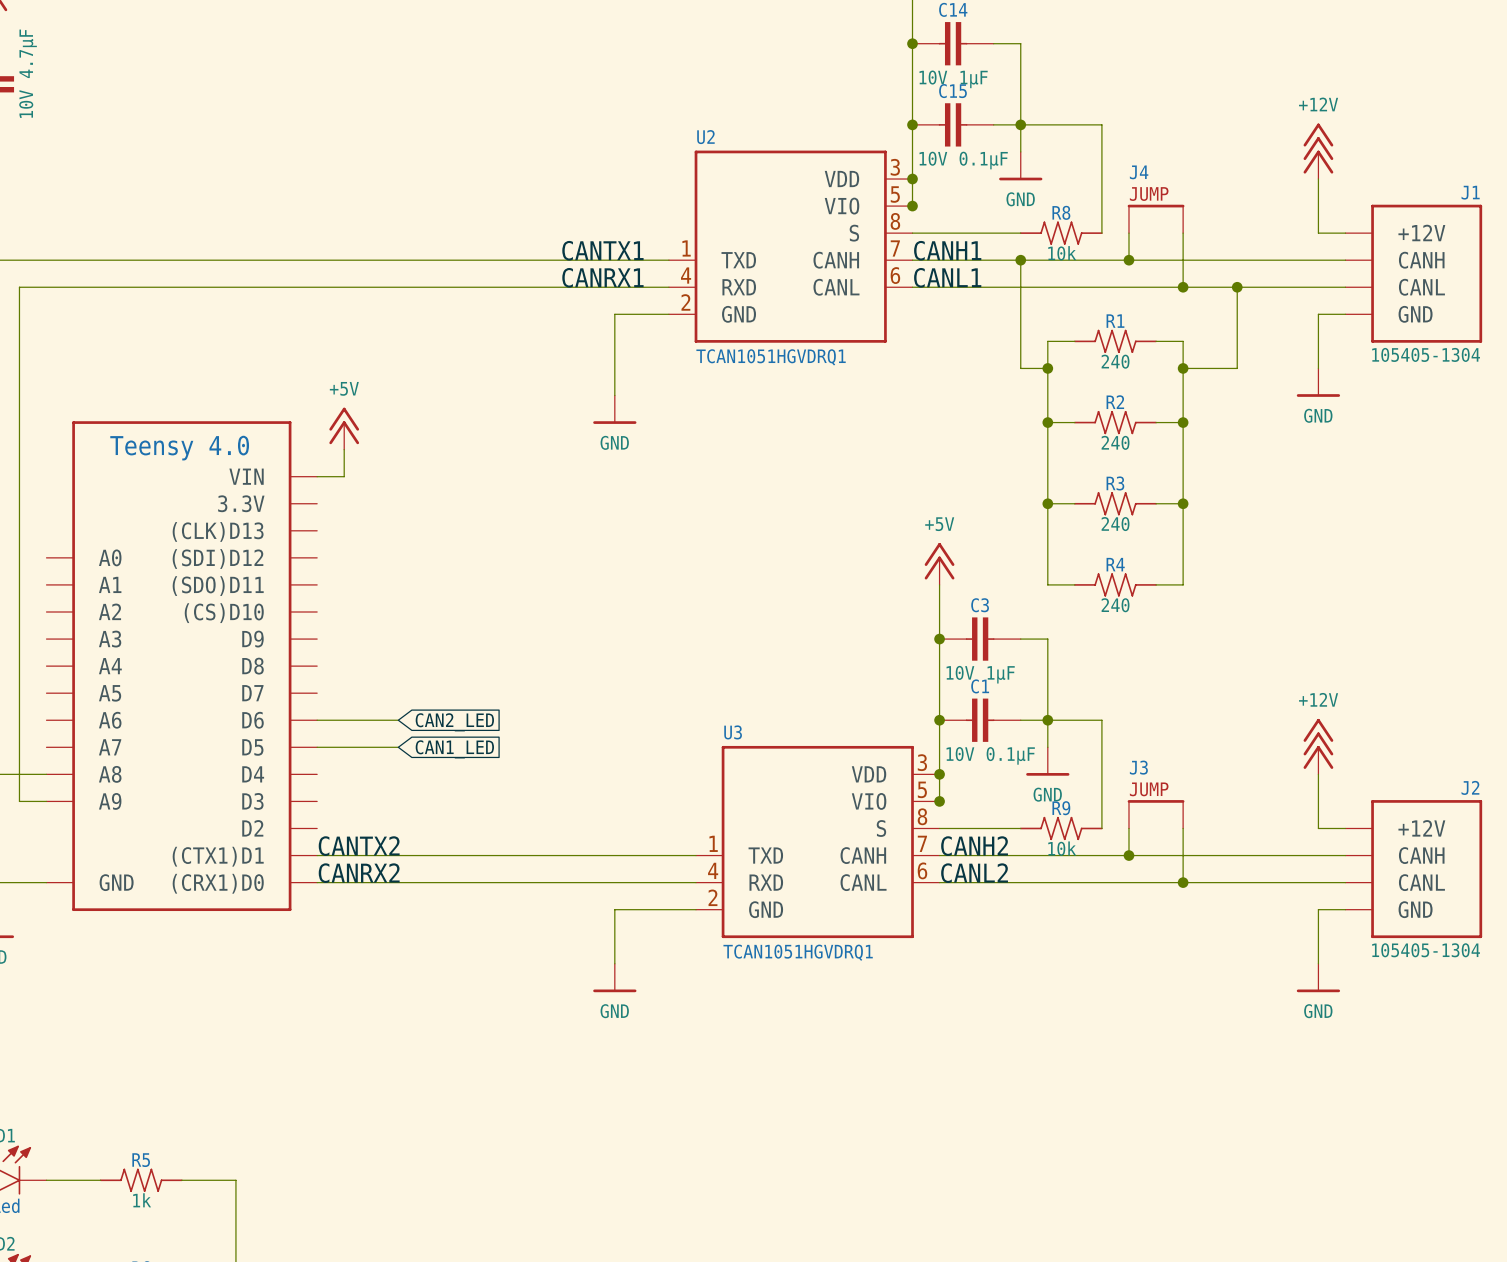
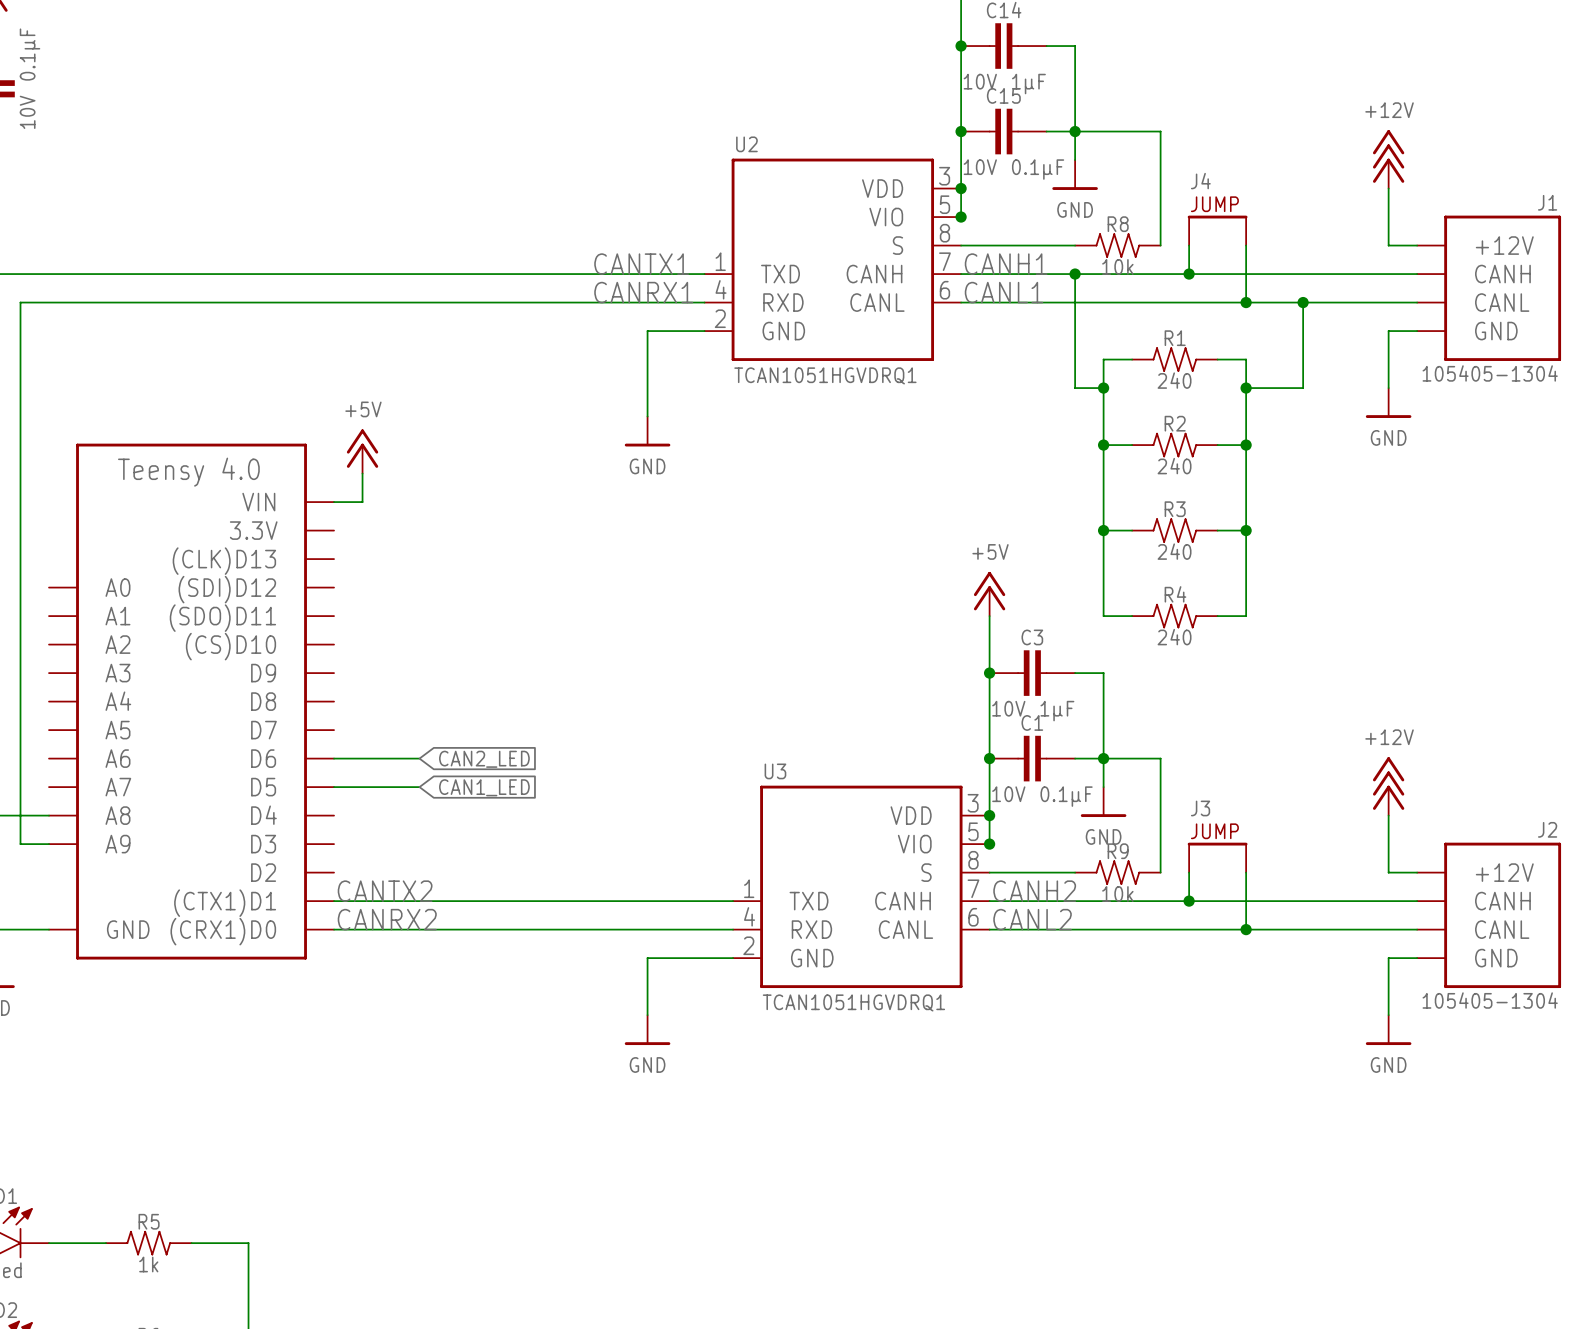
part text: 4.7µF (28, 53) -> 0.1µF (30, 54)

